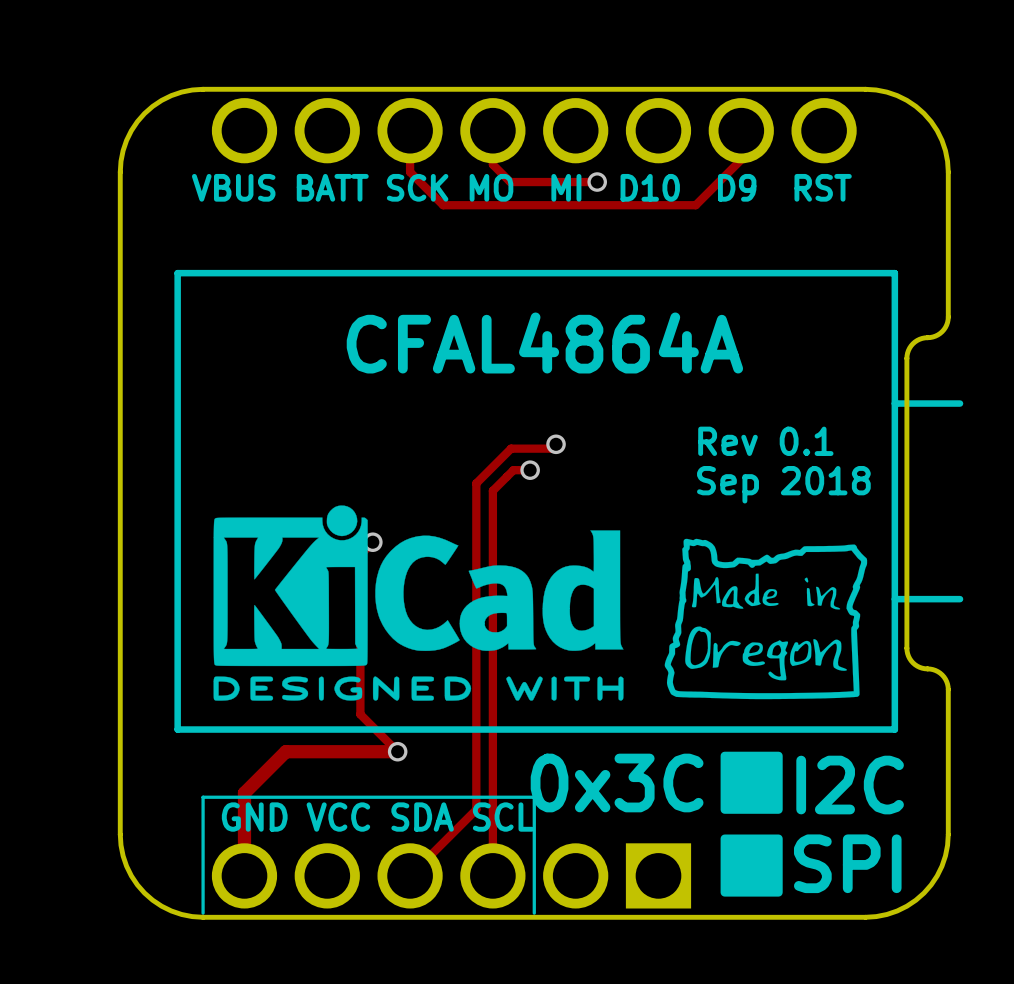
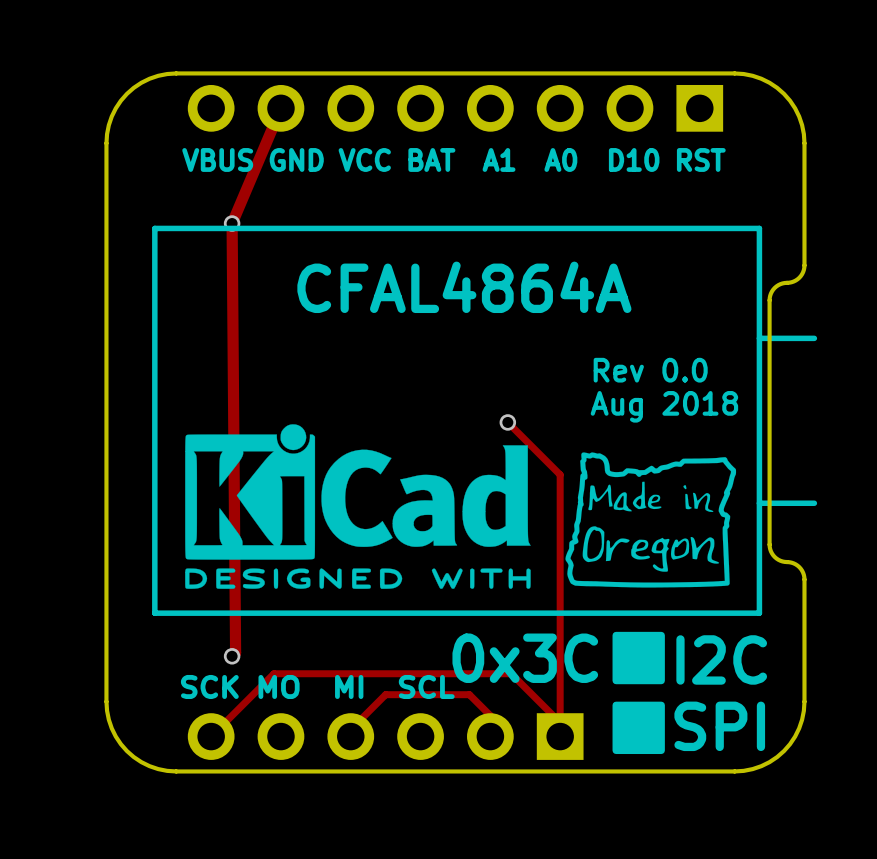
part footprint: [211, 98, 857, 164] -> [187, 84, 724, 132]
track: none -> (280, 108) (232, 223) (235, 652) (232, 656)
track: (410, 130) (410, 172) (443, 205) (695, 205) (741, 159) (741, 130) -> none
track: (492, 130) (492, 164) (510, 182) (597, 182) -> none
via: (597, 182) -> none
text: none -> VBUS GND VCC BAT A1 A0 D10 RST (453, 159)
via: none -> (232, 223)
text: Rev 0.1 (765, 441) -> Rev 0.0 (650, 370)
track: (556, 444) (551, 448) (511, 448) (476, 483) (476, 809) (410, 875) -> (490, 736) (490, 715) (469, 694) (385, 694) (350, 729) (350, 736)
via: (556, 444) -> none
track: (530, 470) (513, 470) (492, 490) (492, 875) -> none
via: (530, 470) -> none
text: Sep 2018 (783, 484) -> Aug 2018 (664, 406)
track: none -> (507, 422) (560, 474) (560, 736)
via: none -> (507, 422)
track: (372, 542) (360, 554) (360, 714) (397, 751) (285, 751) (244, 793) (244, 875) -> (560, 722) (511, 673) (273, 673) (211, 736)
via: (372, 542) -> none
via: (397, 751) -> none
via: none -> (232, 656)
part footprint: [201, 795, 692, 915] -> [187, 713, 584, 760]
text: none -> SCK MO MI SCL (317, 686)

